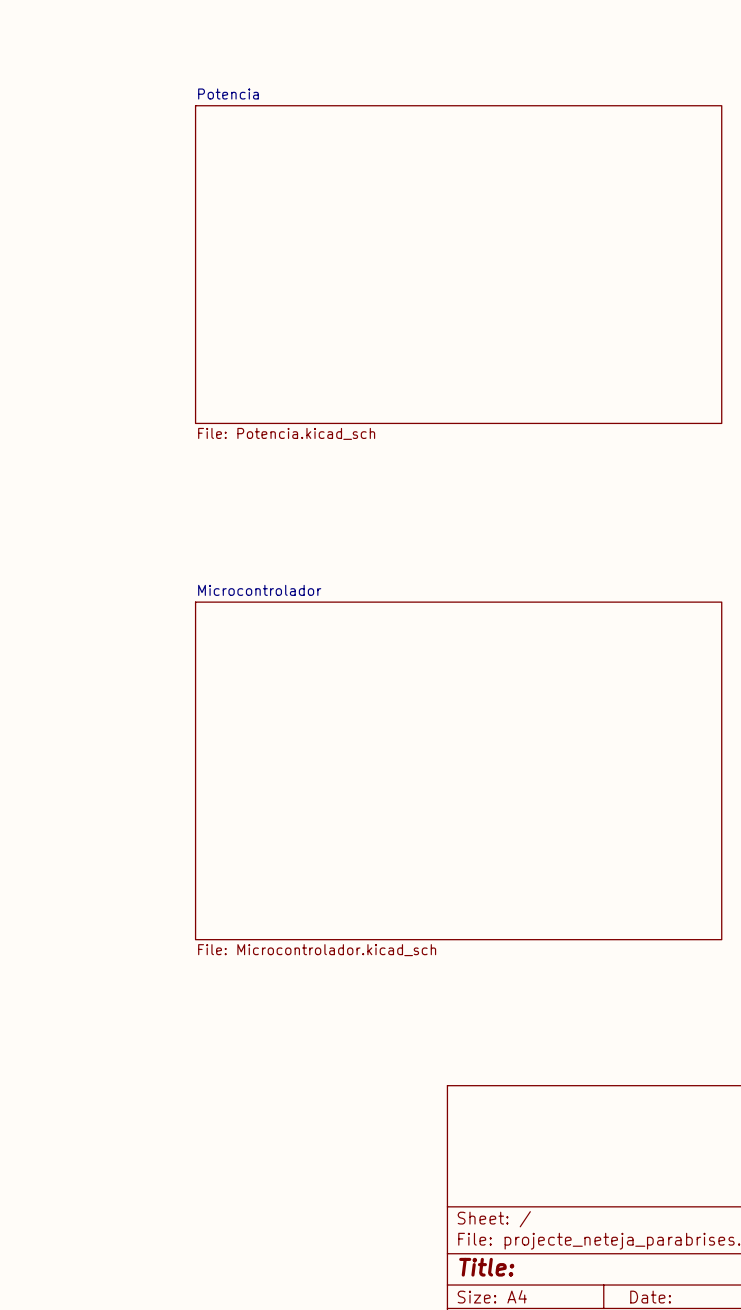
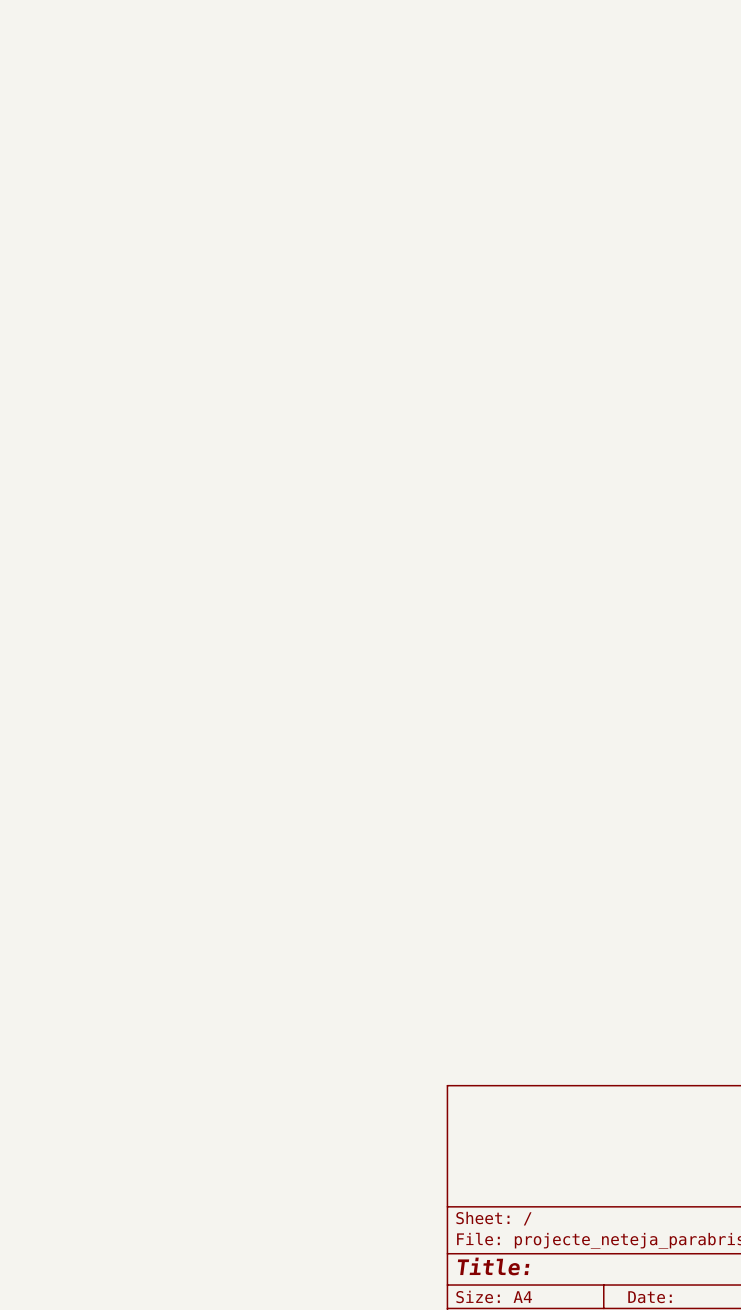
sheet Potencia: File: Potencia.kicad_sch (458, 264) -> none
sheet Microcontrolador: File: Microcontrolador.kicad_sch (458, 770) -> none

